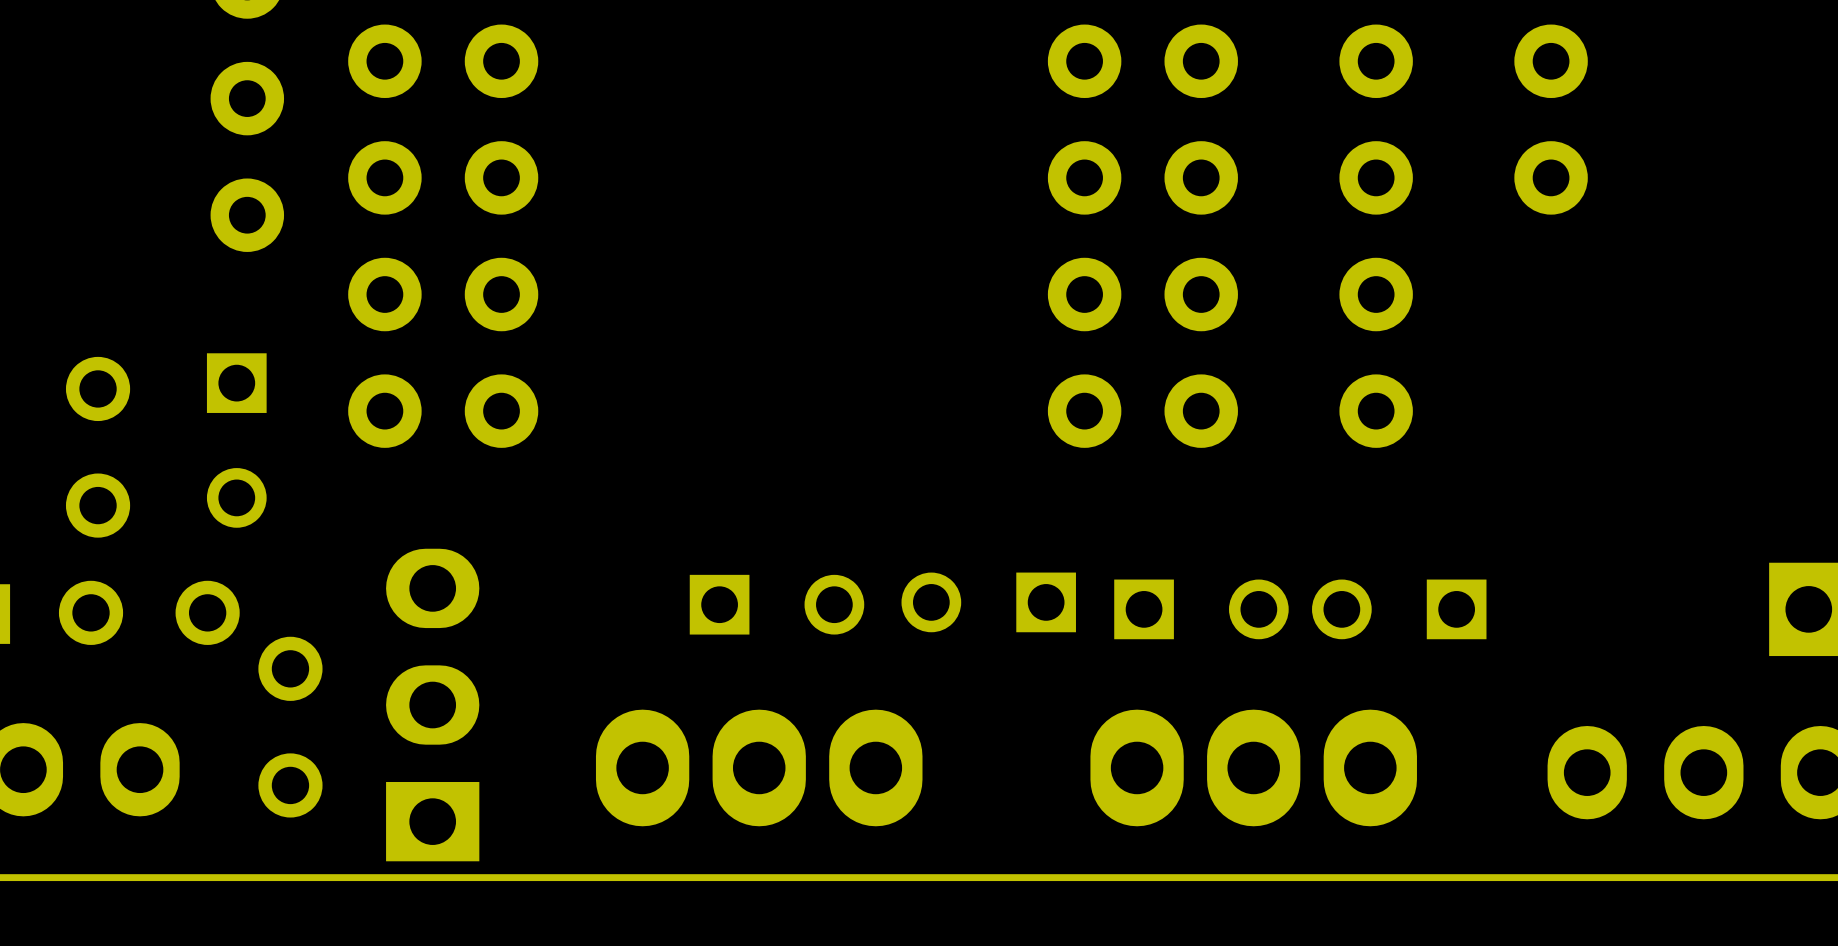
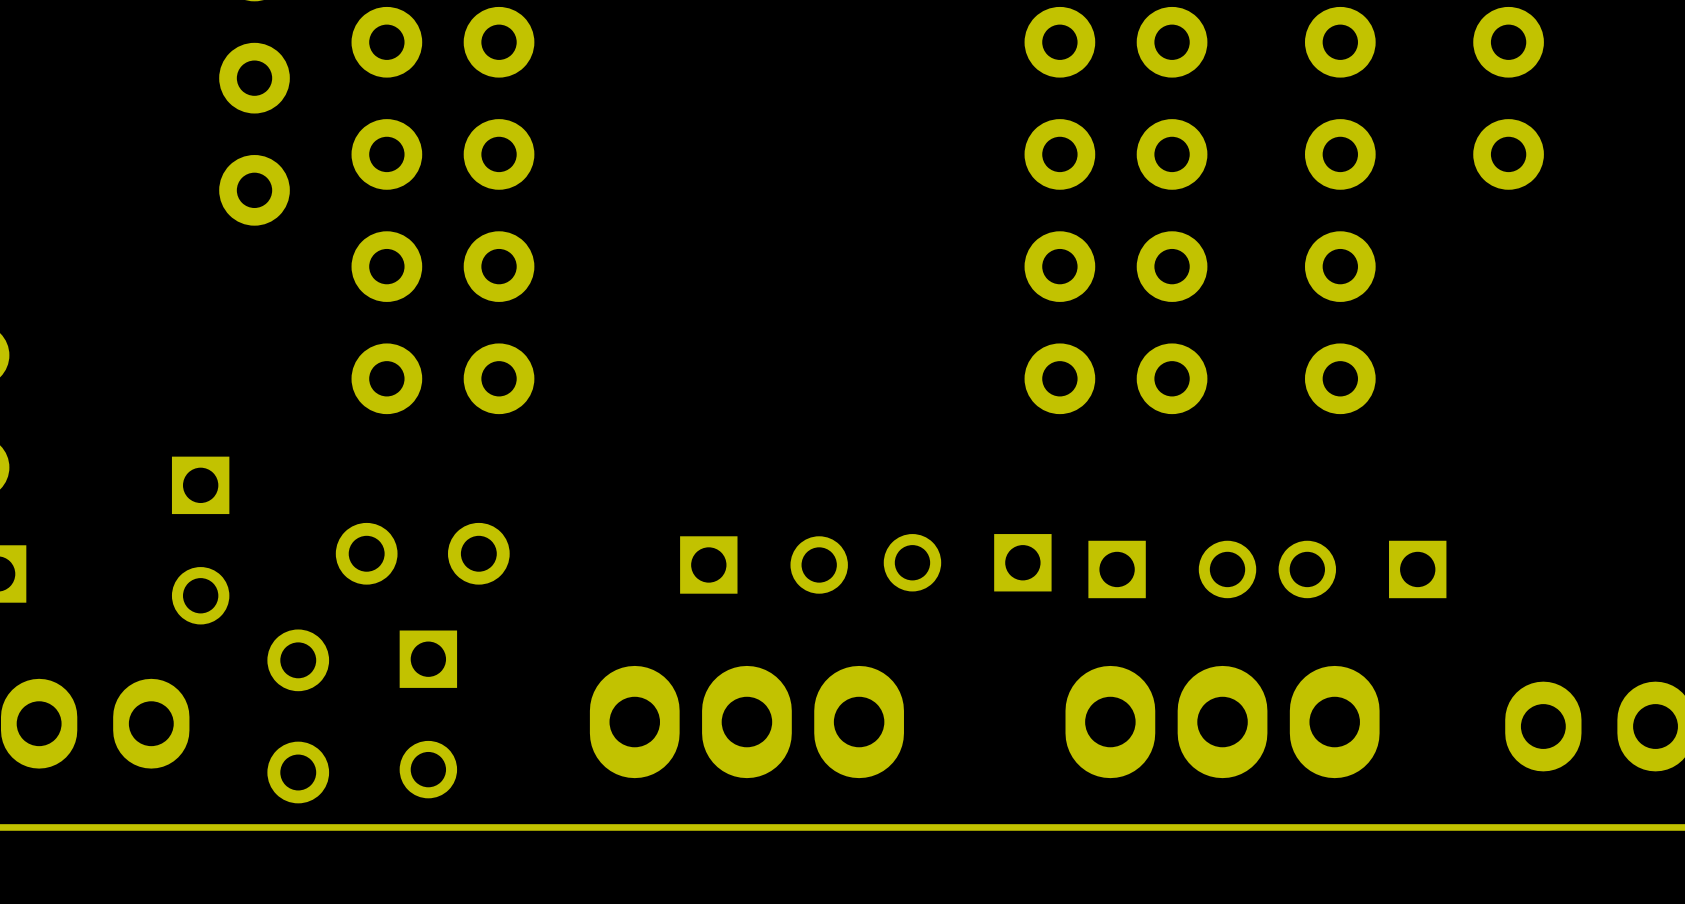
part position: (236, 440) -> (200, 540)
part: (98, 447) -> none
part: none -> (422, 553)
part: (149, 612) -> none
part: (432, 705) -> none
part position: (290, 727) -> (298, 716)
part: none -> (428, 714)

